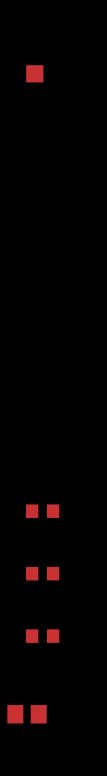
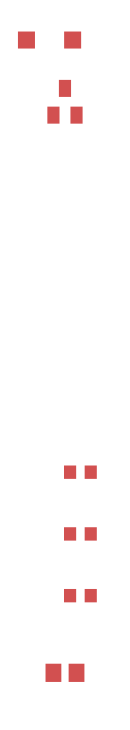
part: none -> (64, 101)

